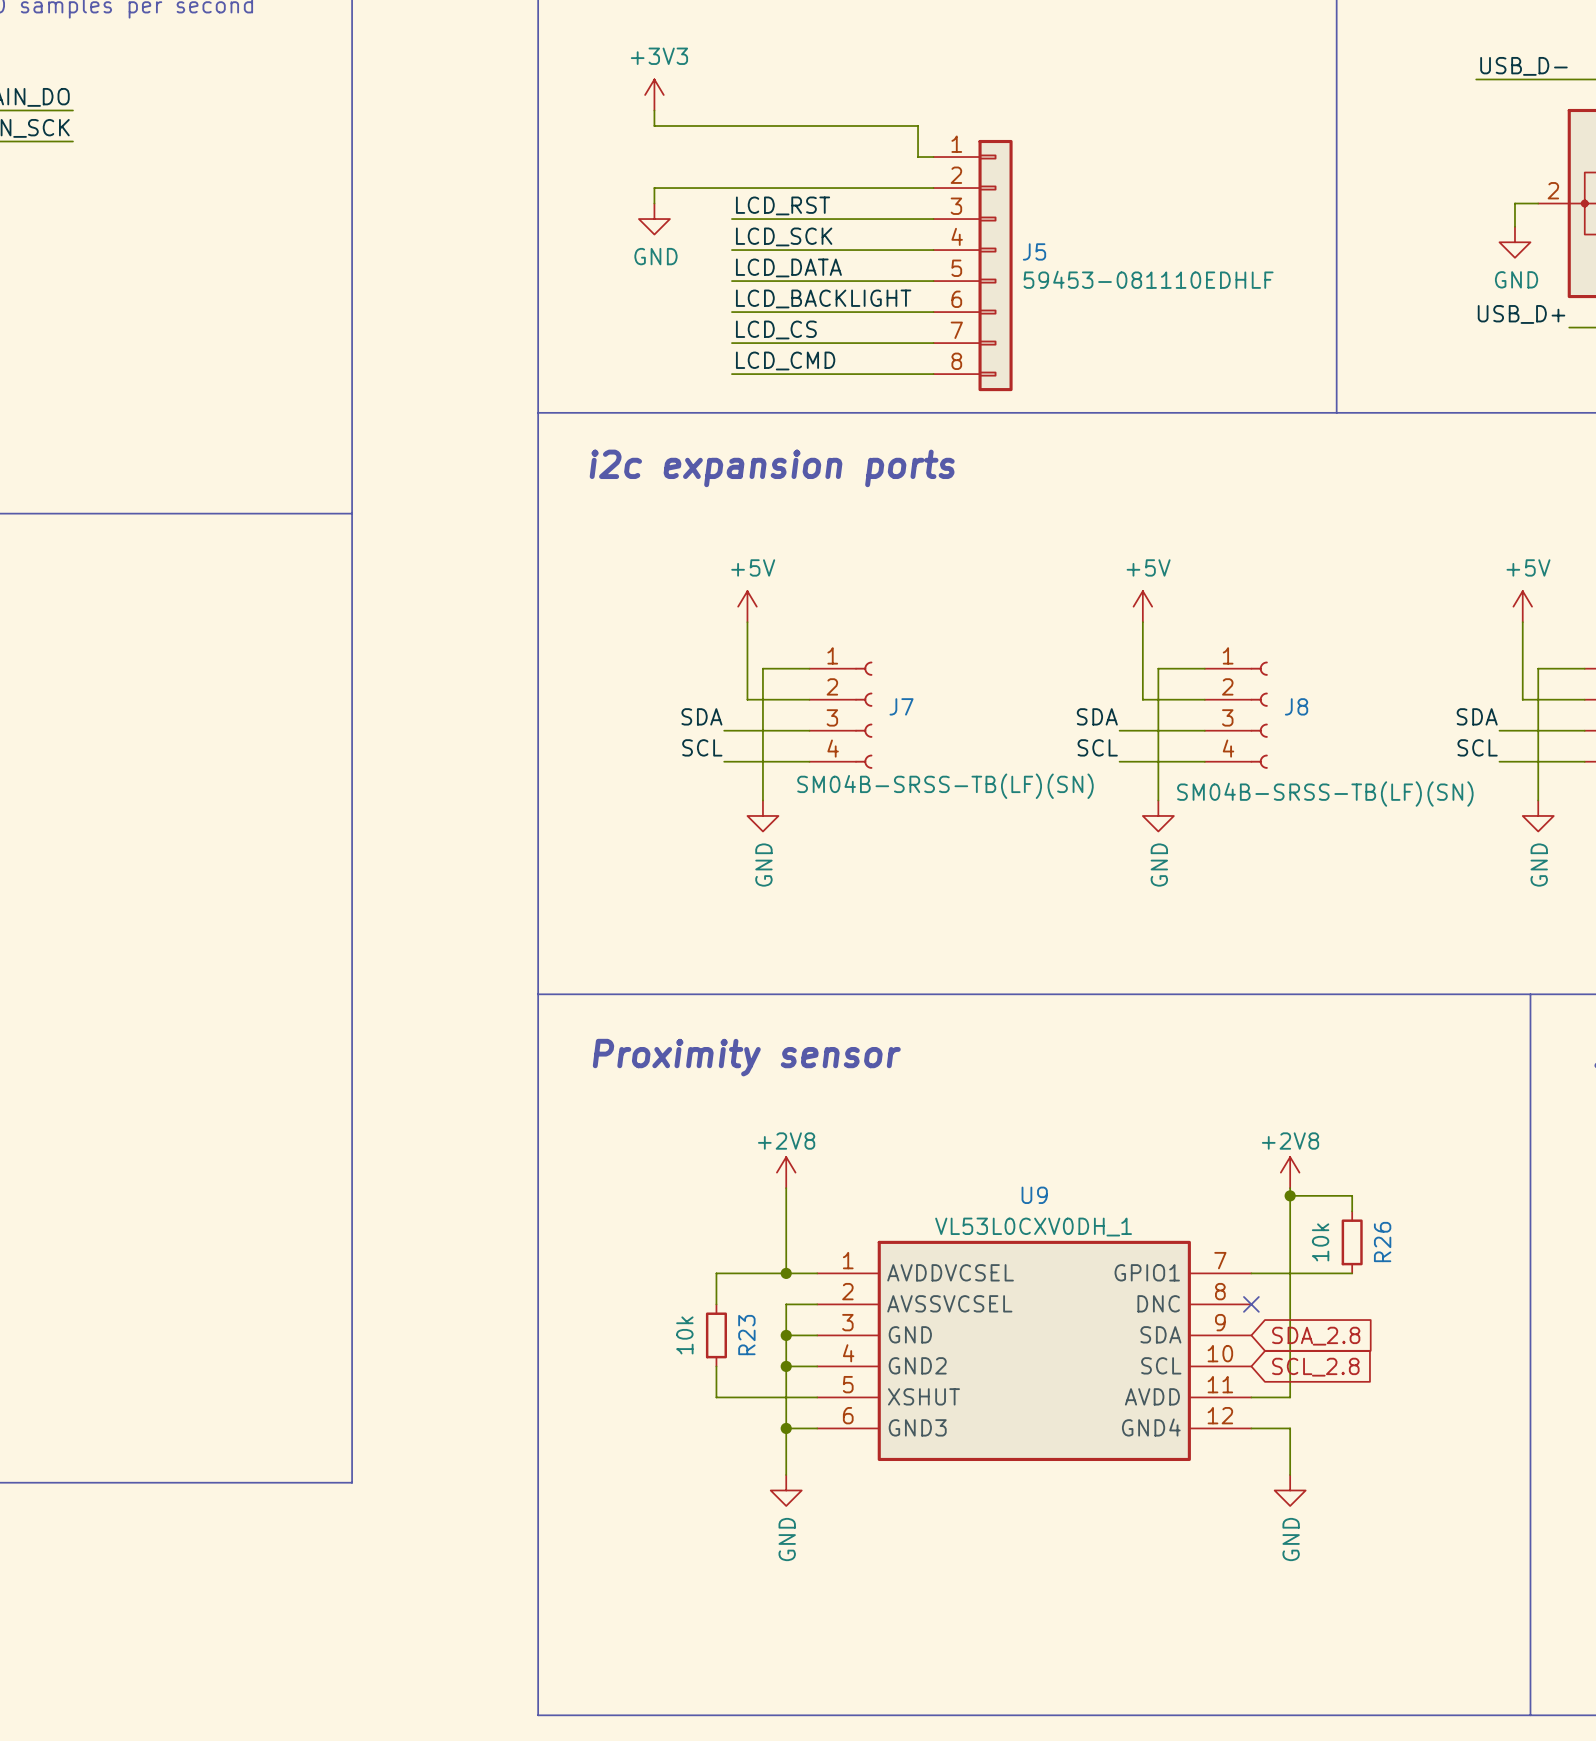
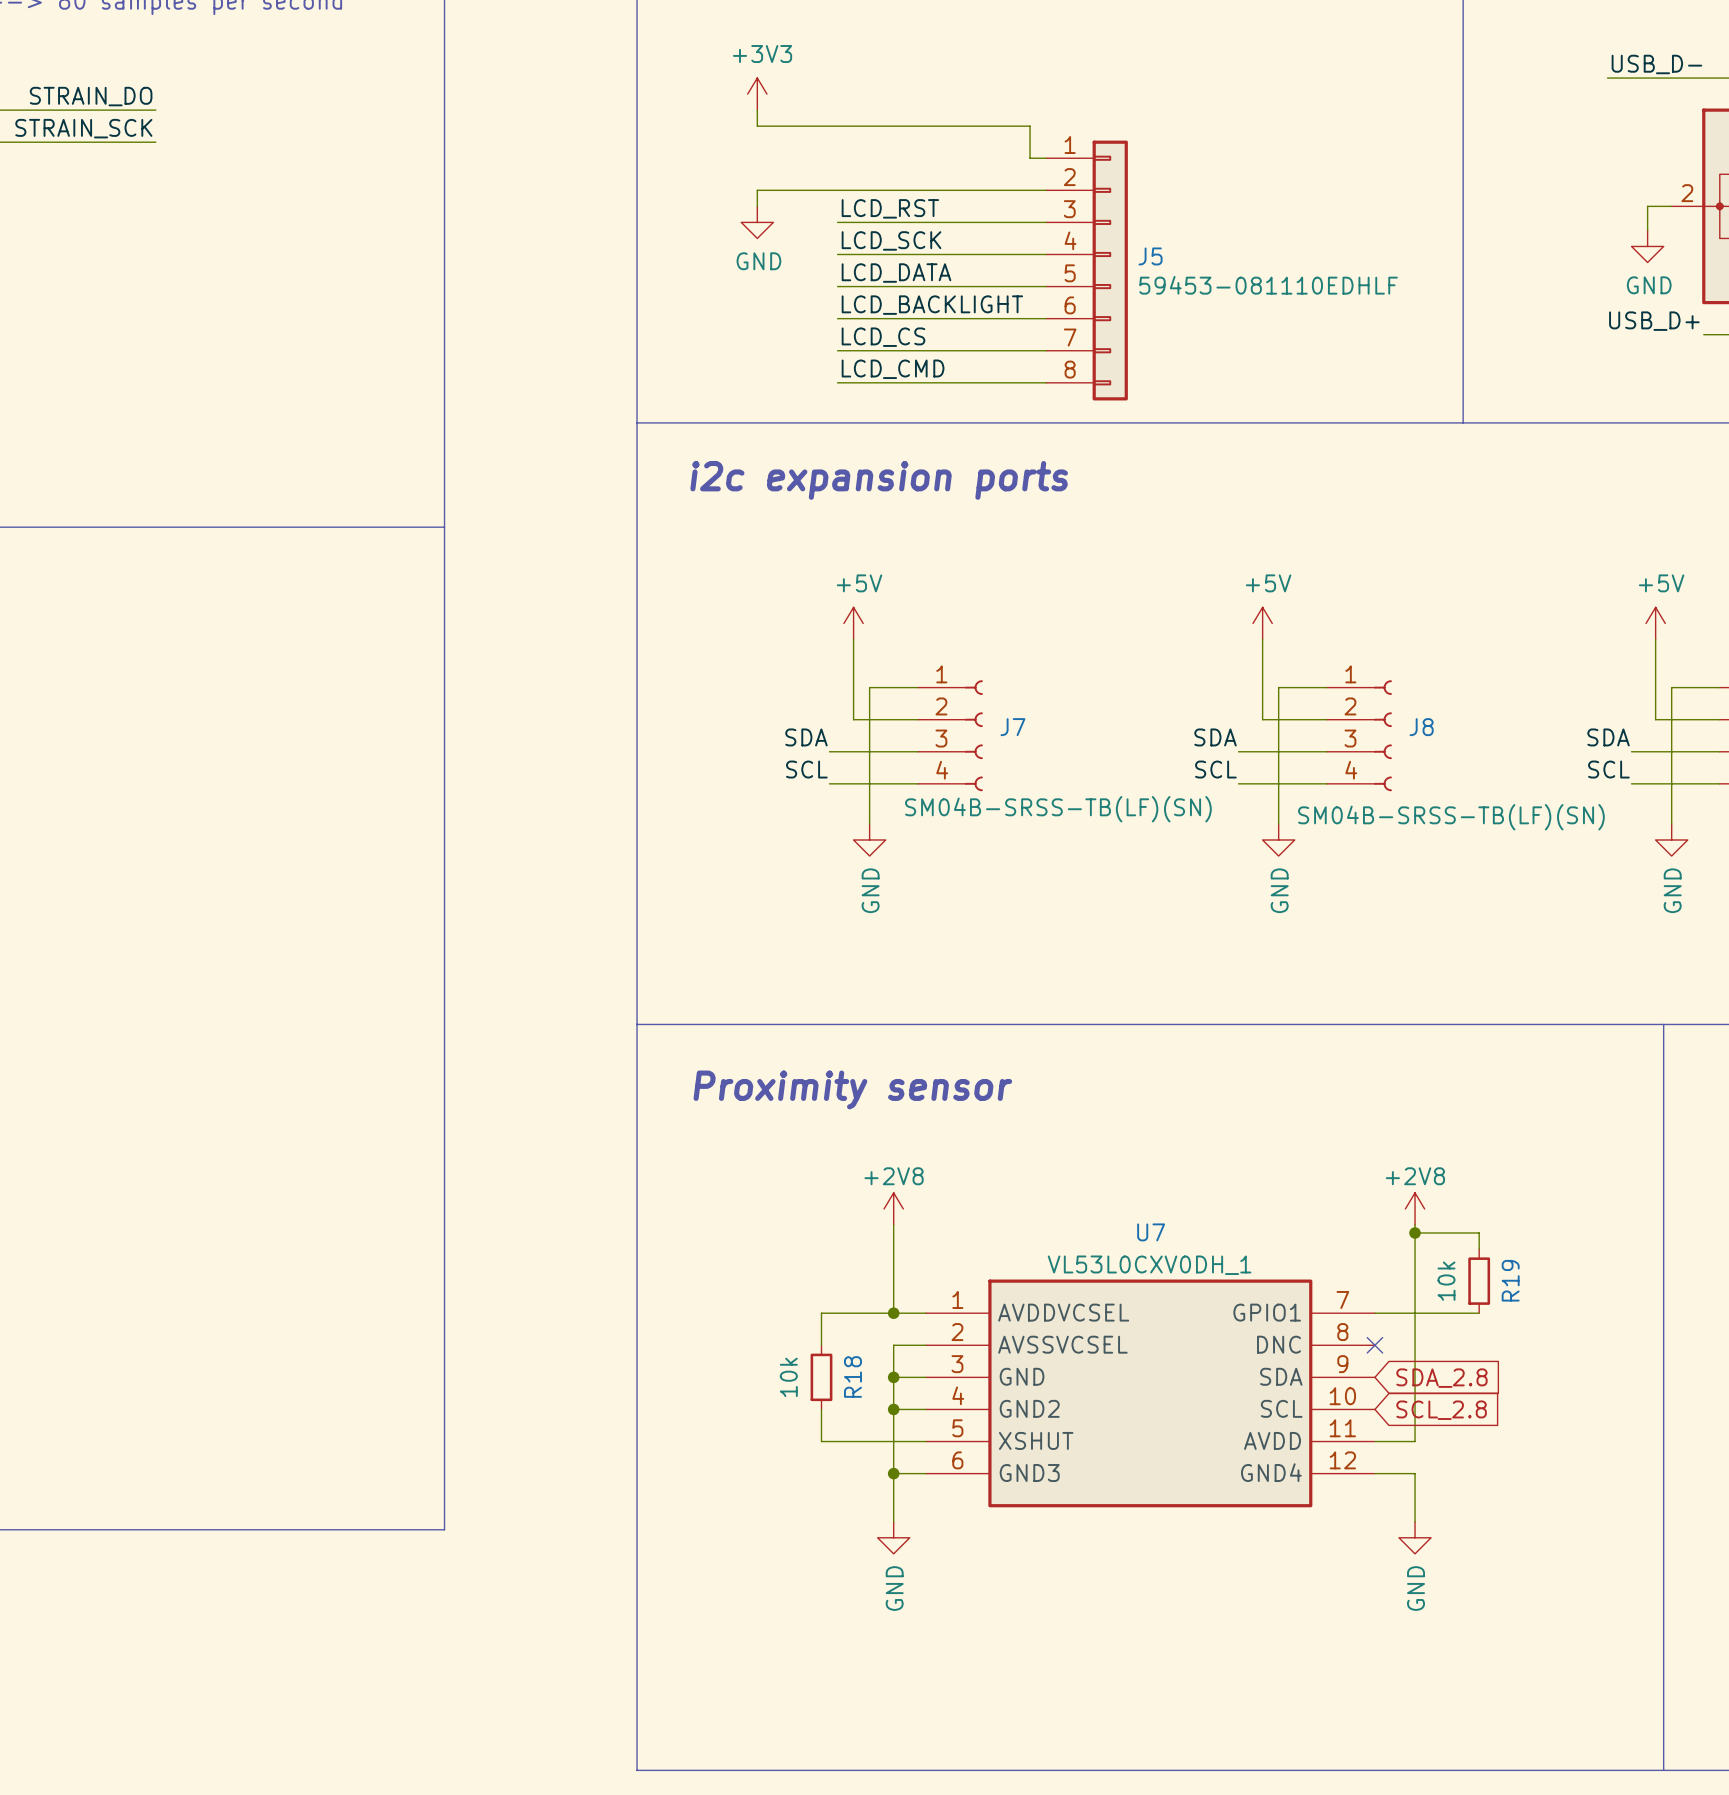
U9 name: U9 (1034, 1195) -> U7 (1151, 1232)
R26 name: R26 (1382, 1242) -> R19 (1510, 1280)
R23 name: R23 (746, 1335) -> R18 (852, 1376)

